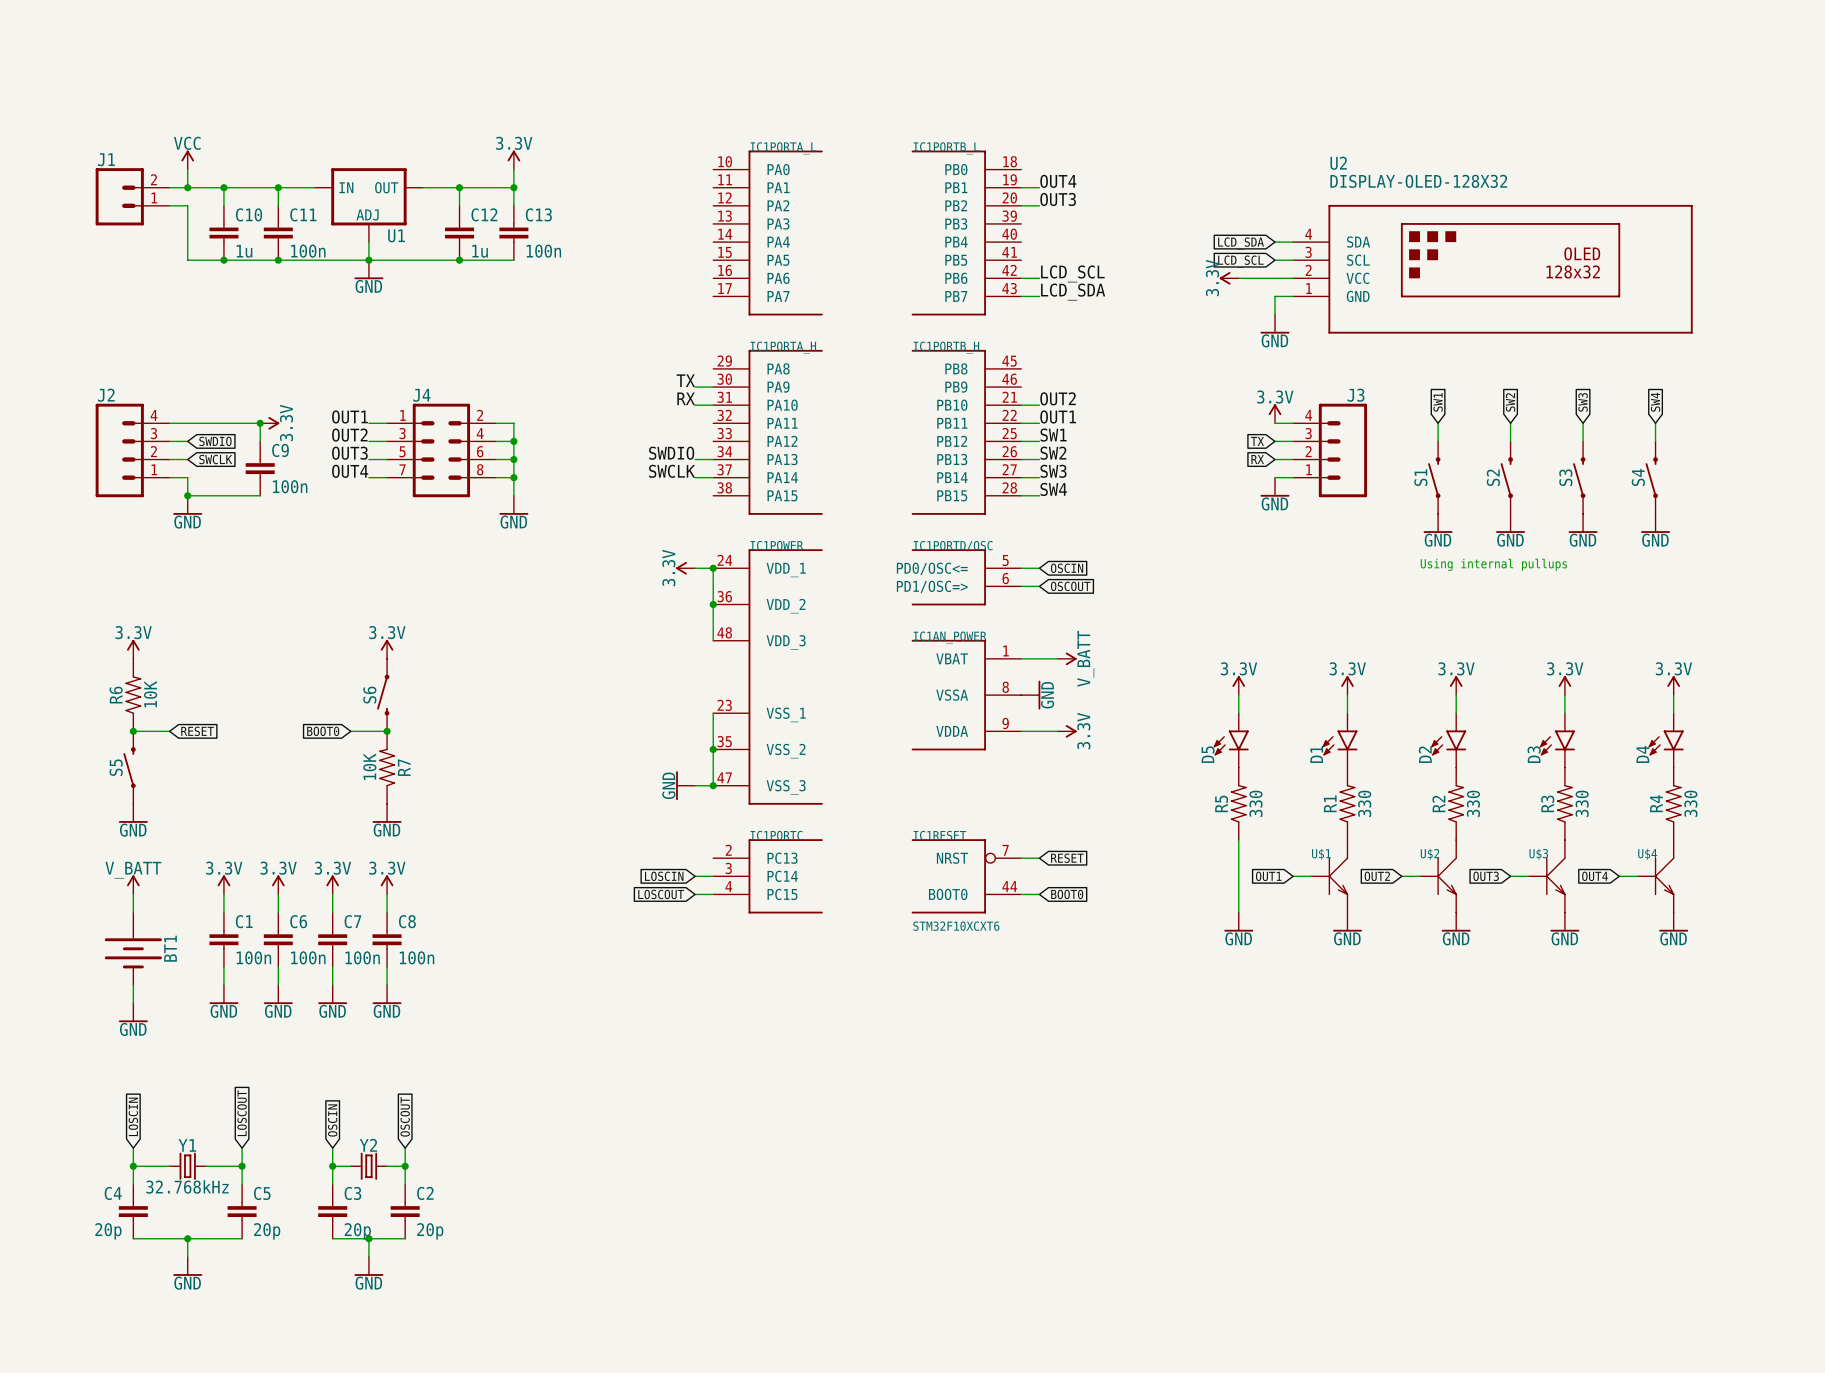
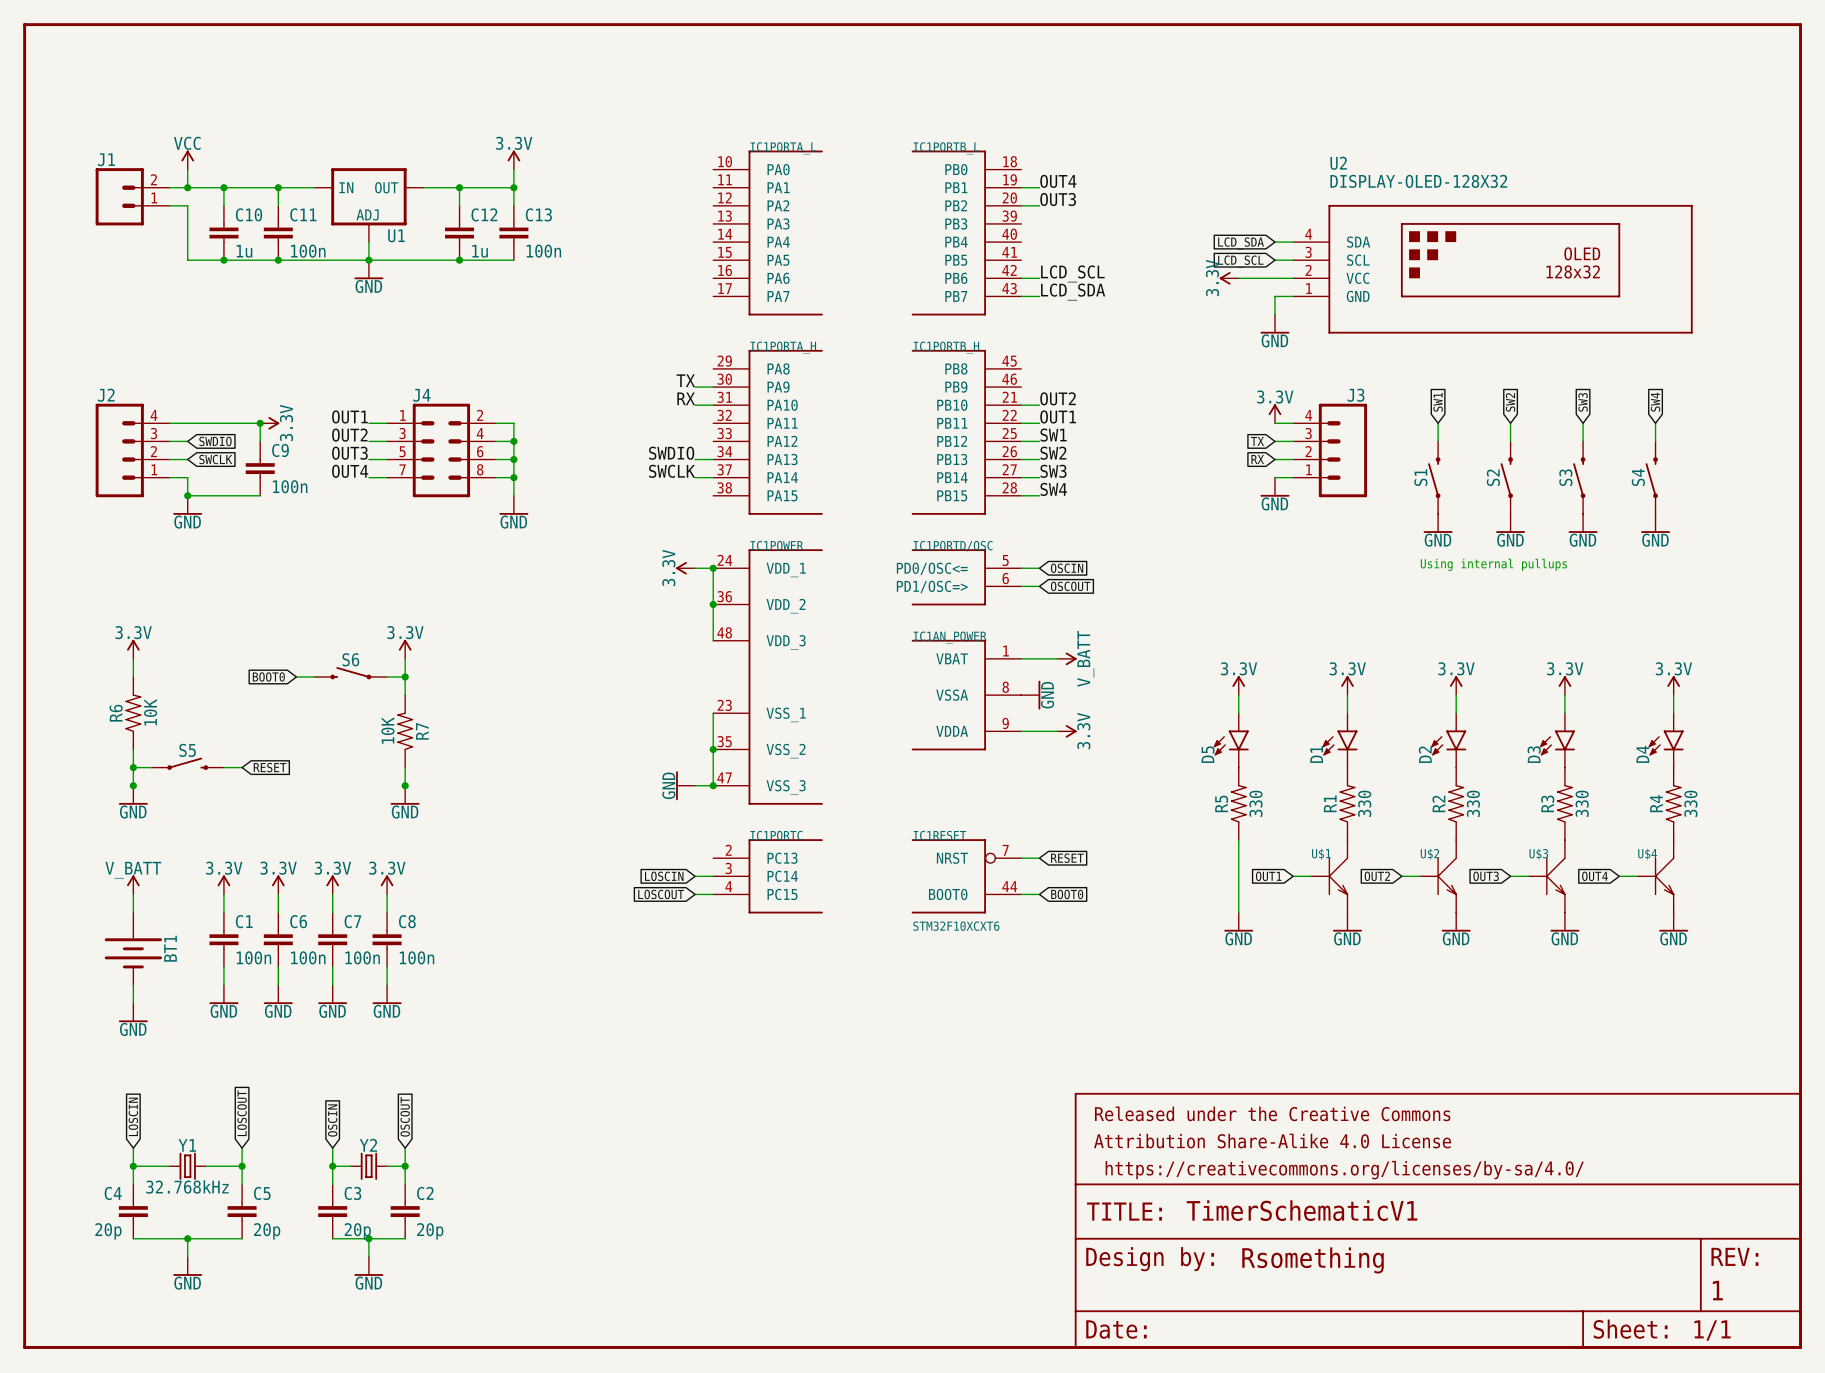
power symbol position: 3.3V (387, 649) -> 3.3V (405, 649)
wire: none -> (405, 658) (405, 695)
wire: none -> (296, 676) (314, 676)
wire: none -> (387, 676) (405, 676)
junction: none -> (405, 676)
part: none -> (912, 686)
R6 position: (133, 695) -> (133, 713)
S6 rotation: 0° (383, 695) -> 90° clockwise (350, 673)
wire: (133, 731) (169, 731) -> none
junction: (133, 731) -> none
global label position: RESET (197, 731) -> RESET (270, 767)
global label position: BOOT0 (323, 731) -> BOOT0 (268, 676)
wire: (350, 731) (387, 731) -> none
junction: (387, 731) -> none
wire: none -> (133, 749) (133, 785)
S5 rotation: 0° (129, 767) -> 90° clockwise (187, 763)
S5 position: (129, 767) -> (187, 763)
wire: none -> (133, 767) (151, 767)
junction: none -> (133, 767)
wire: none -> (223, 767) (242, 767)
R7 position: (387, 767) -> (405, 731)
wire: none -> (405, 767) (405, 785)
junction: none -> (133, 785)
junction: none -> (405, 785)
power symbol position: GND (133, 813) -> GND (133, 795)
power symbol position: GND (387, 813) -> GND (405, 795)
part: none -> (1438, 1220)

